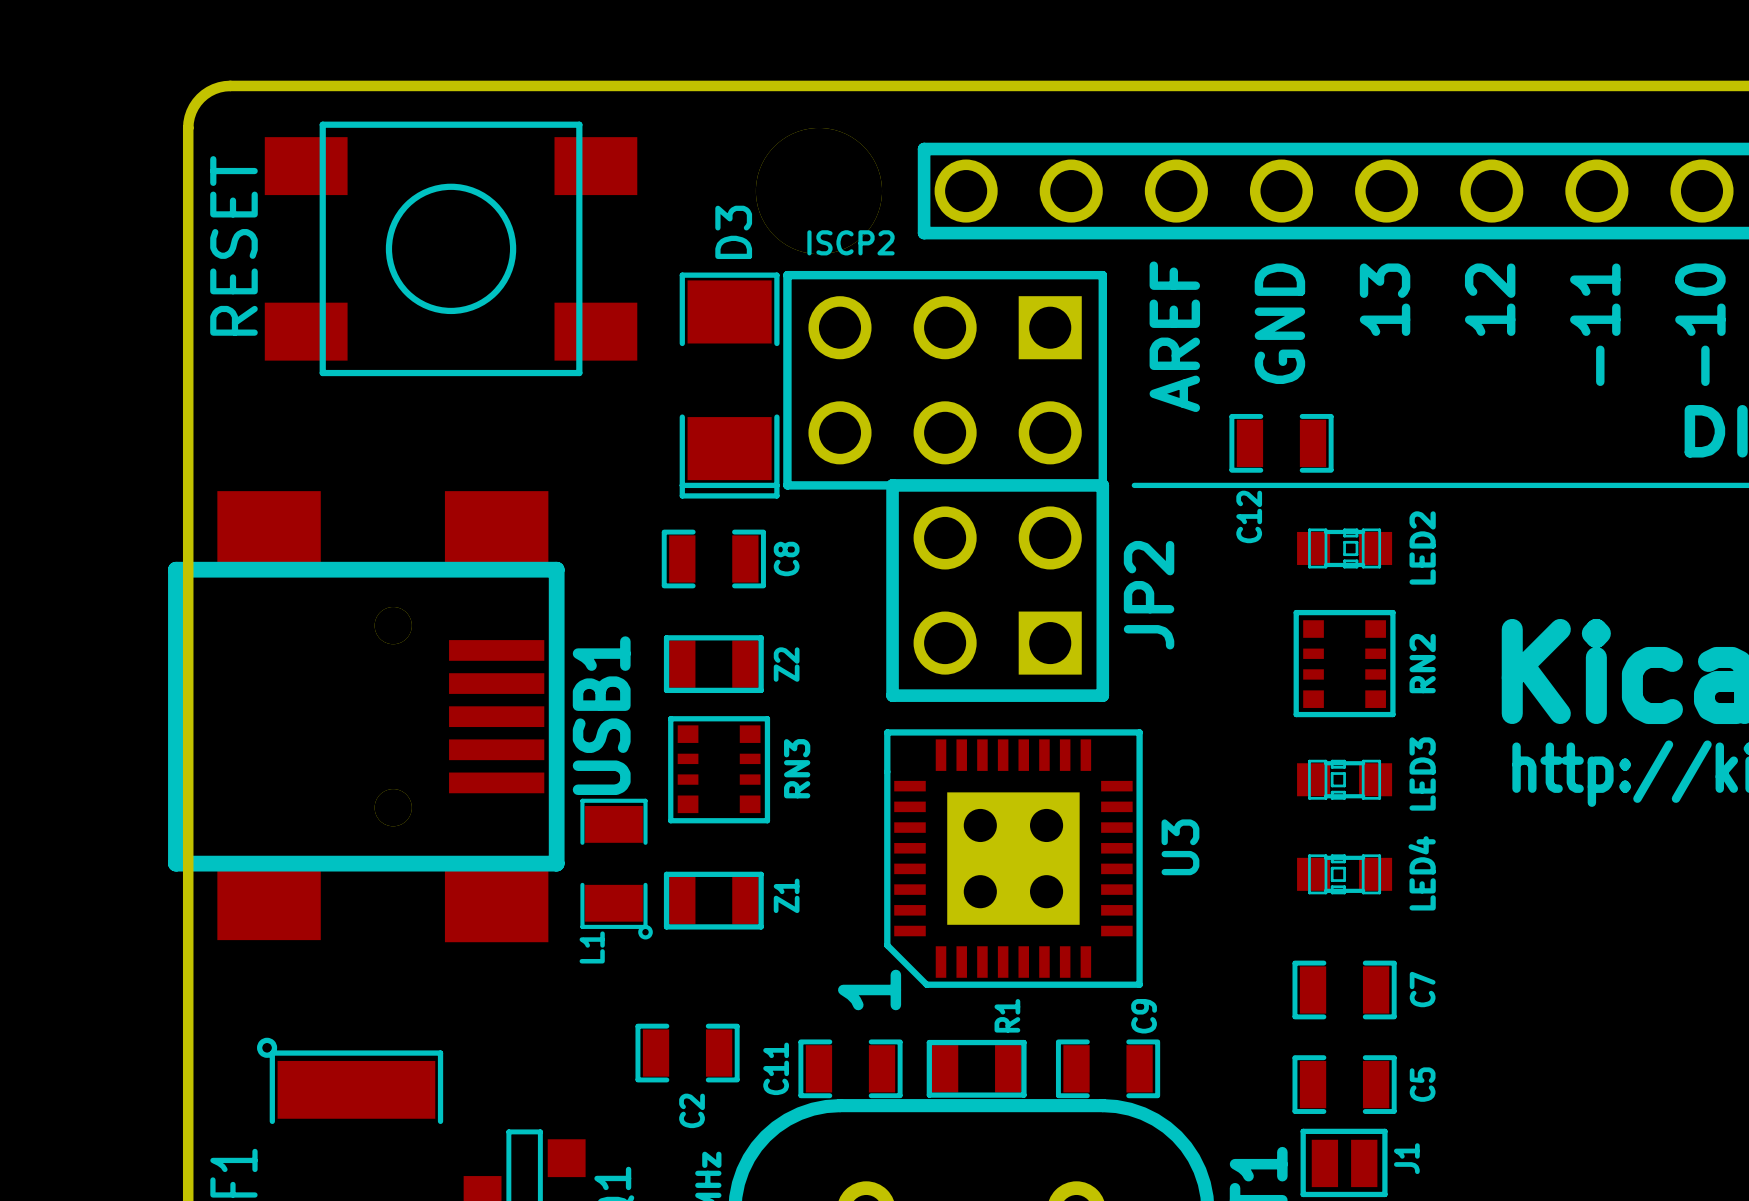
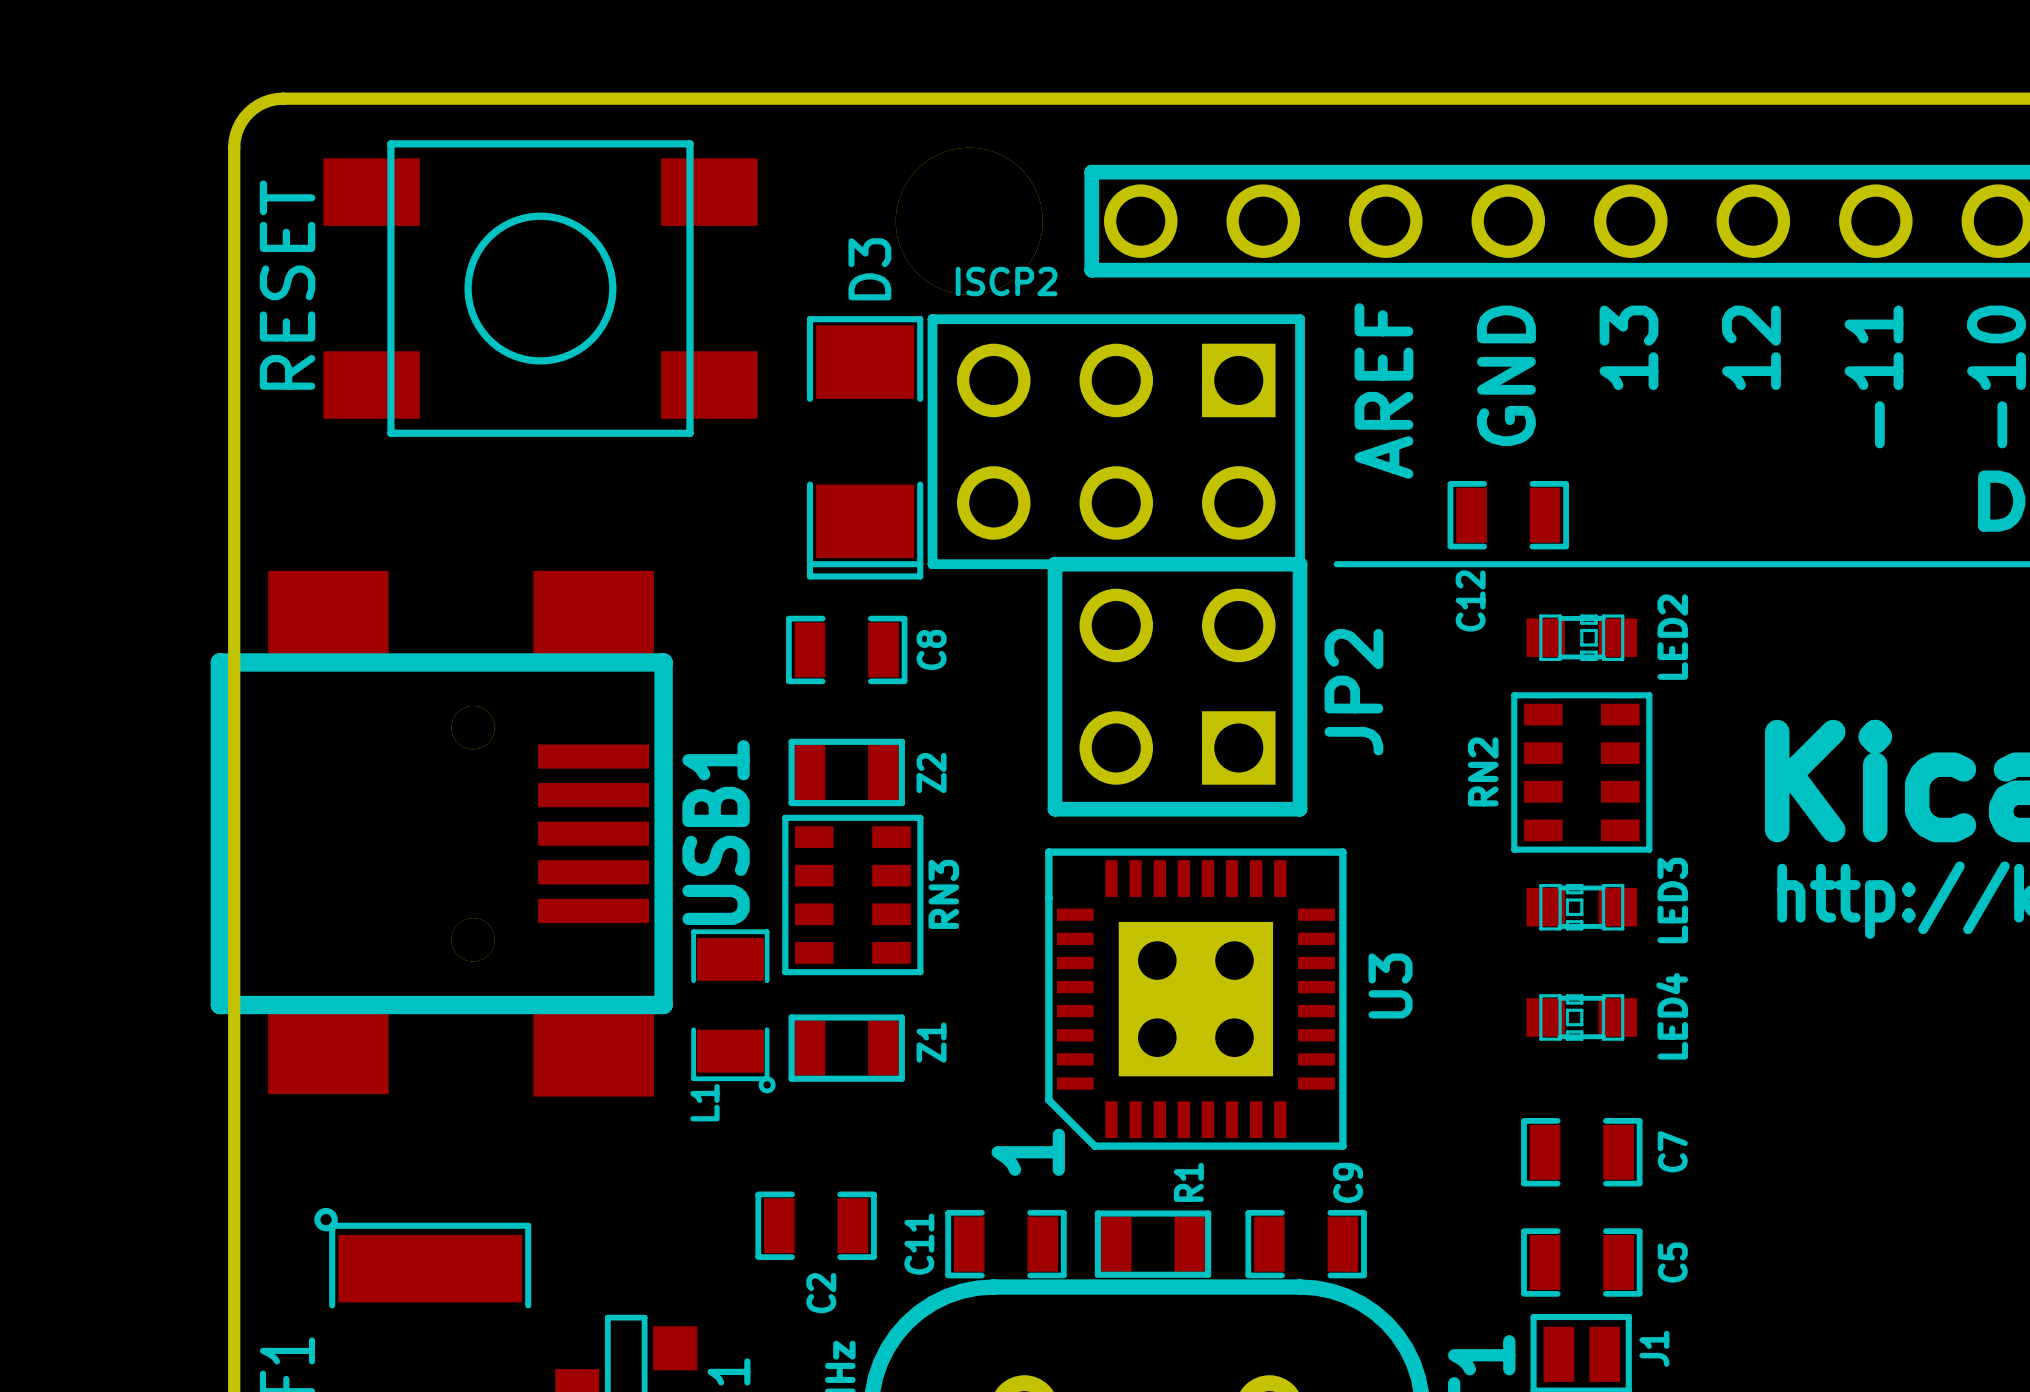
RN2 footprint: [1293, 609, 1396, 718] -> [1511, 692, 1653, 853]
RN2 name position: RN2 (1422, 663) -> RN2 (1483, 771)
RN3 footprint: [668, 716, 771, 824] -> [782, 814, 924, 976]

